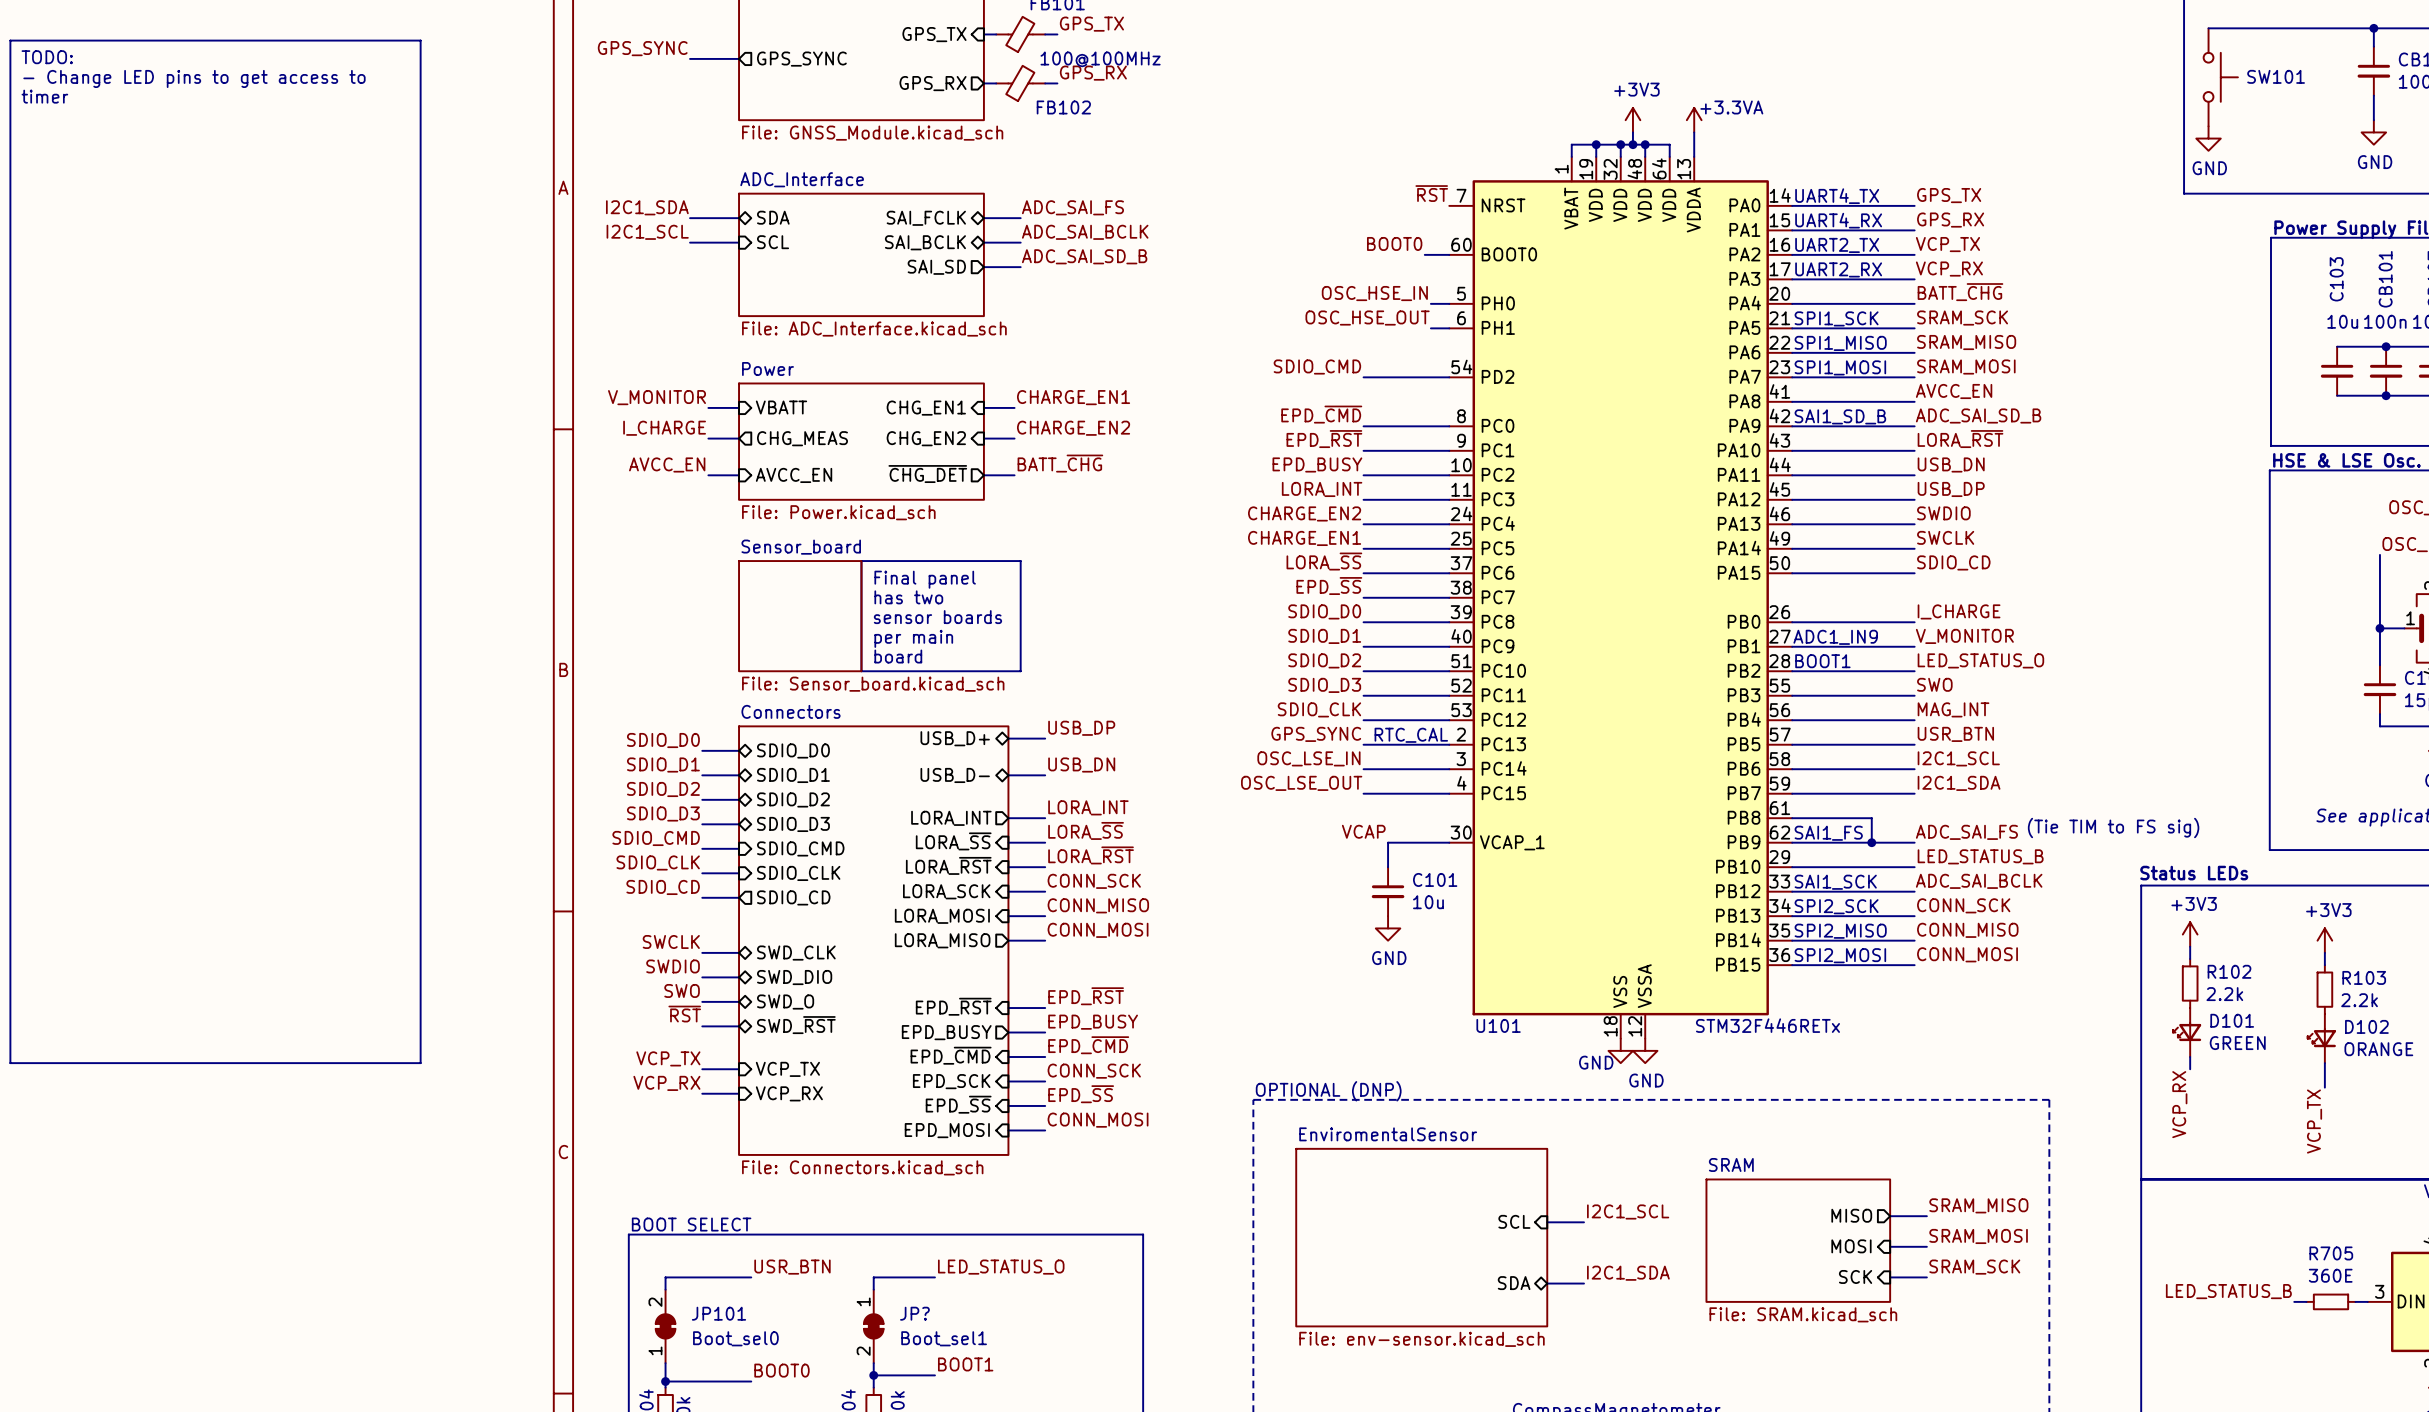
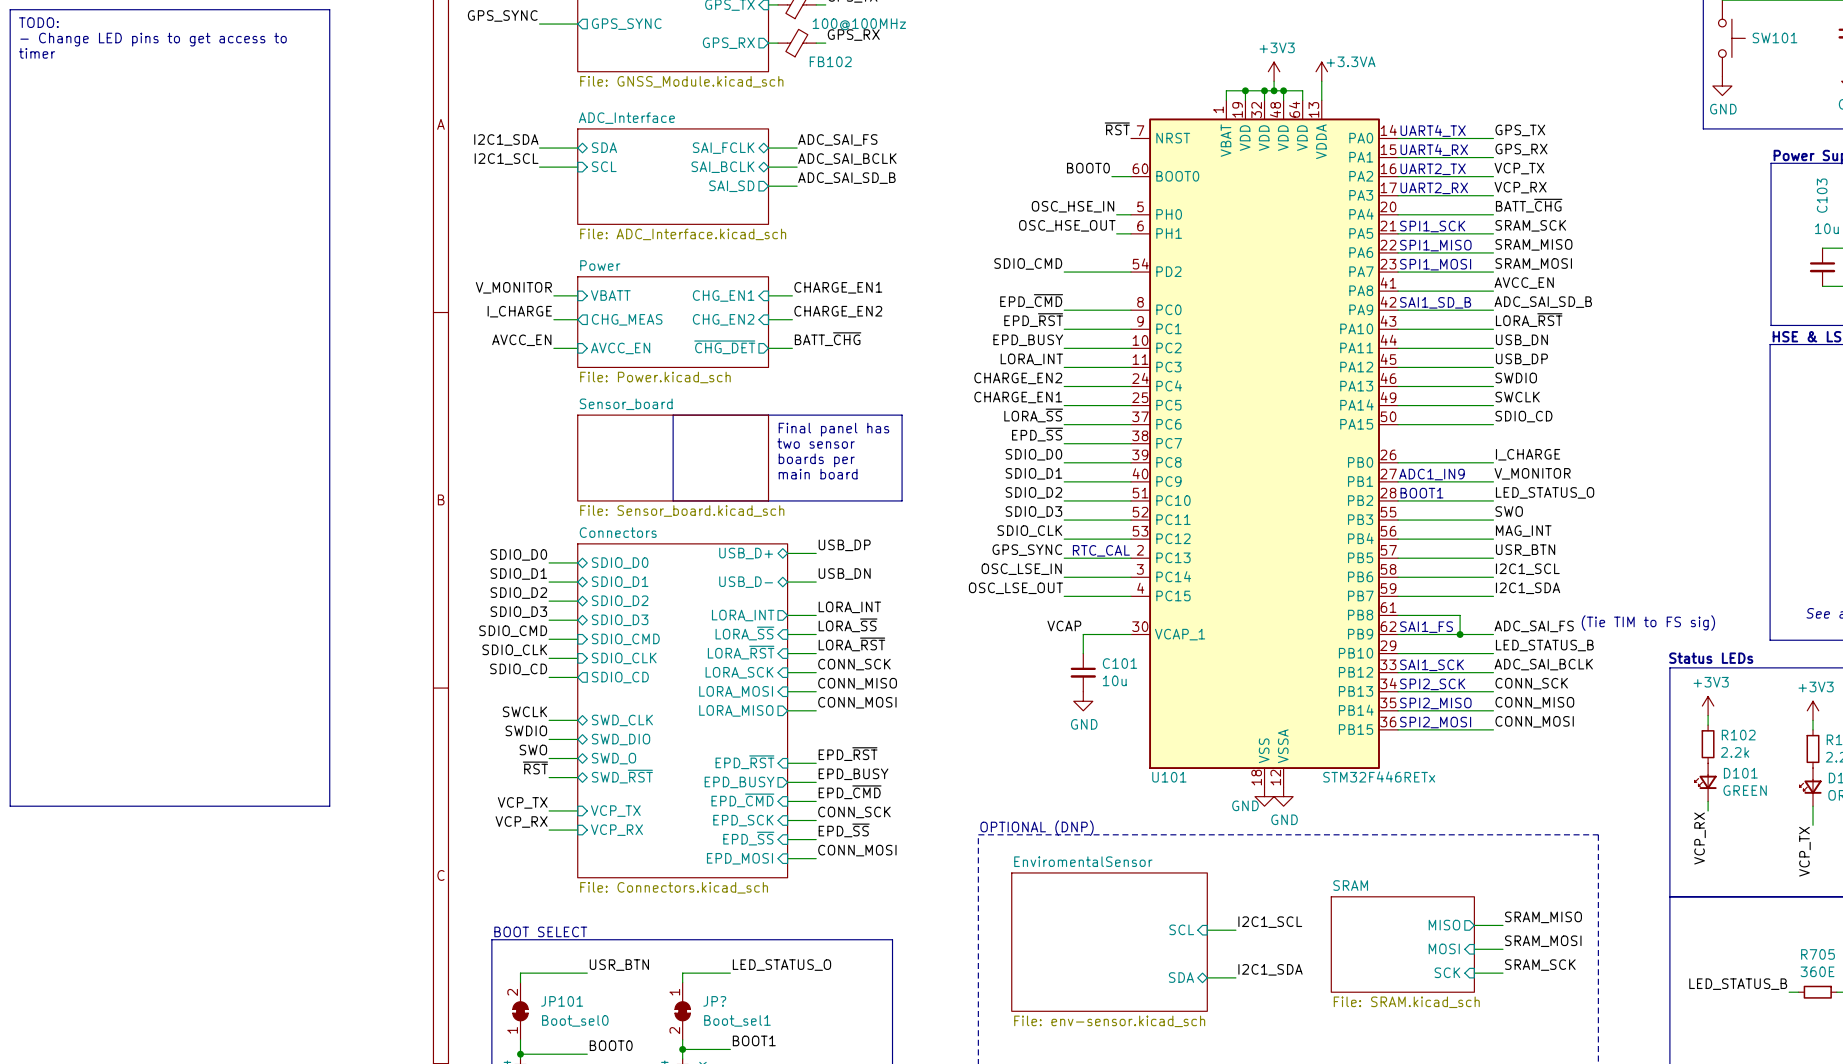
line: (1020, 561) (1020, 671) -> (797, 415) (902, 415) (902, 500) (797, 500)
text: Final panel (925, 579) -> Final panel has (833, 429)
text: has two (908, 597) -> none
text: none -> two sensor (816, 443)
sheet Sensor_board: File: Sensor_board.kicad_sch (800, 616) -> none
sheet Sensor_board: none -> File: Sensor_board.kicad_sch (673, 458)
text: sensor boards (937, 617) -> main board (818, 474)
text: none -> boards per (816, 460)
text: per main (913, 638) -> none
text: board (898, 656) -> none

